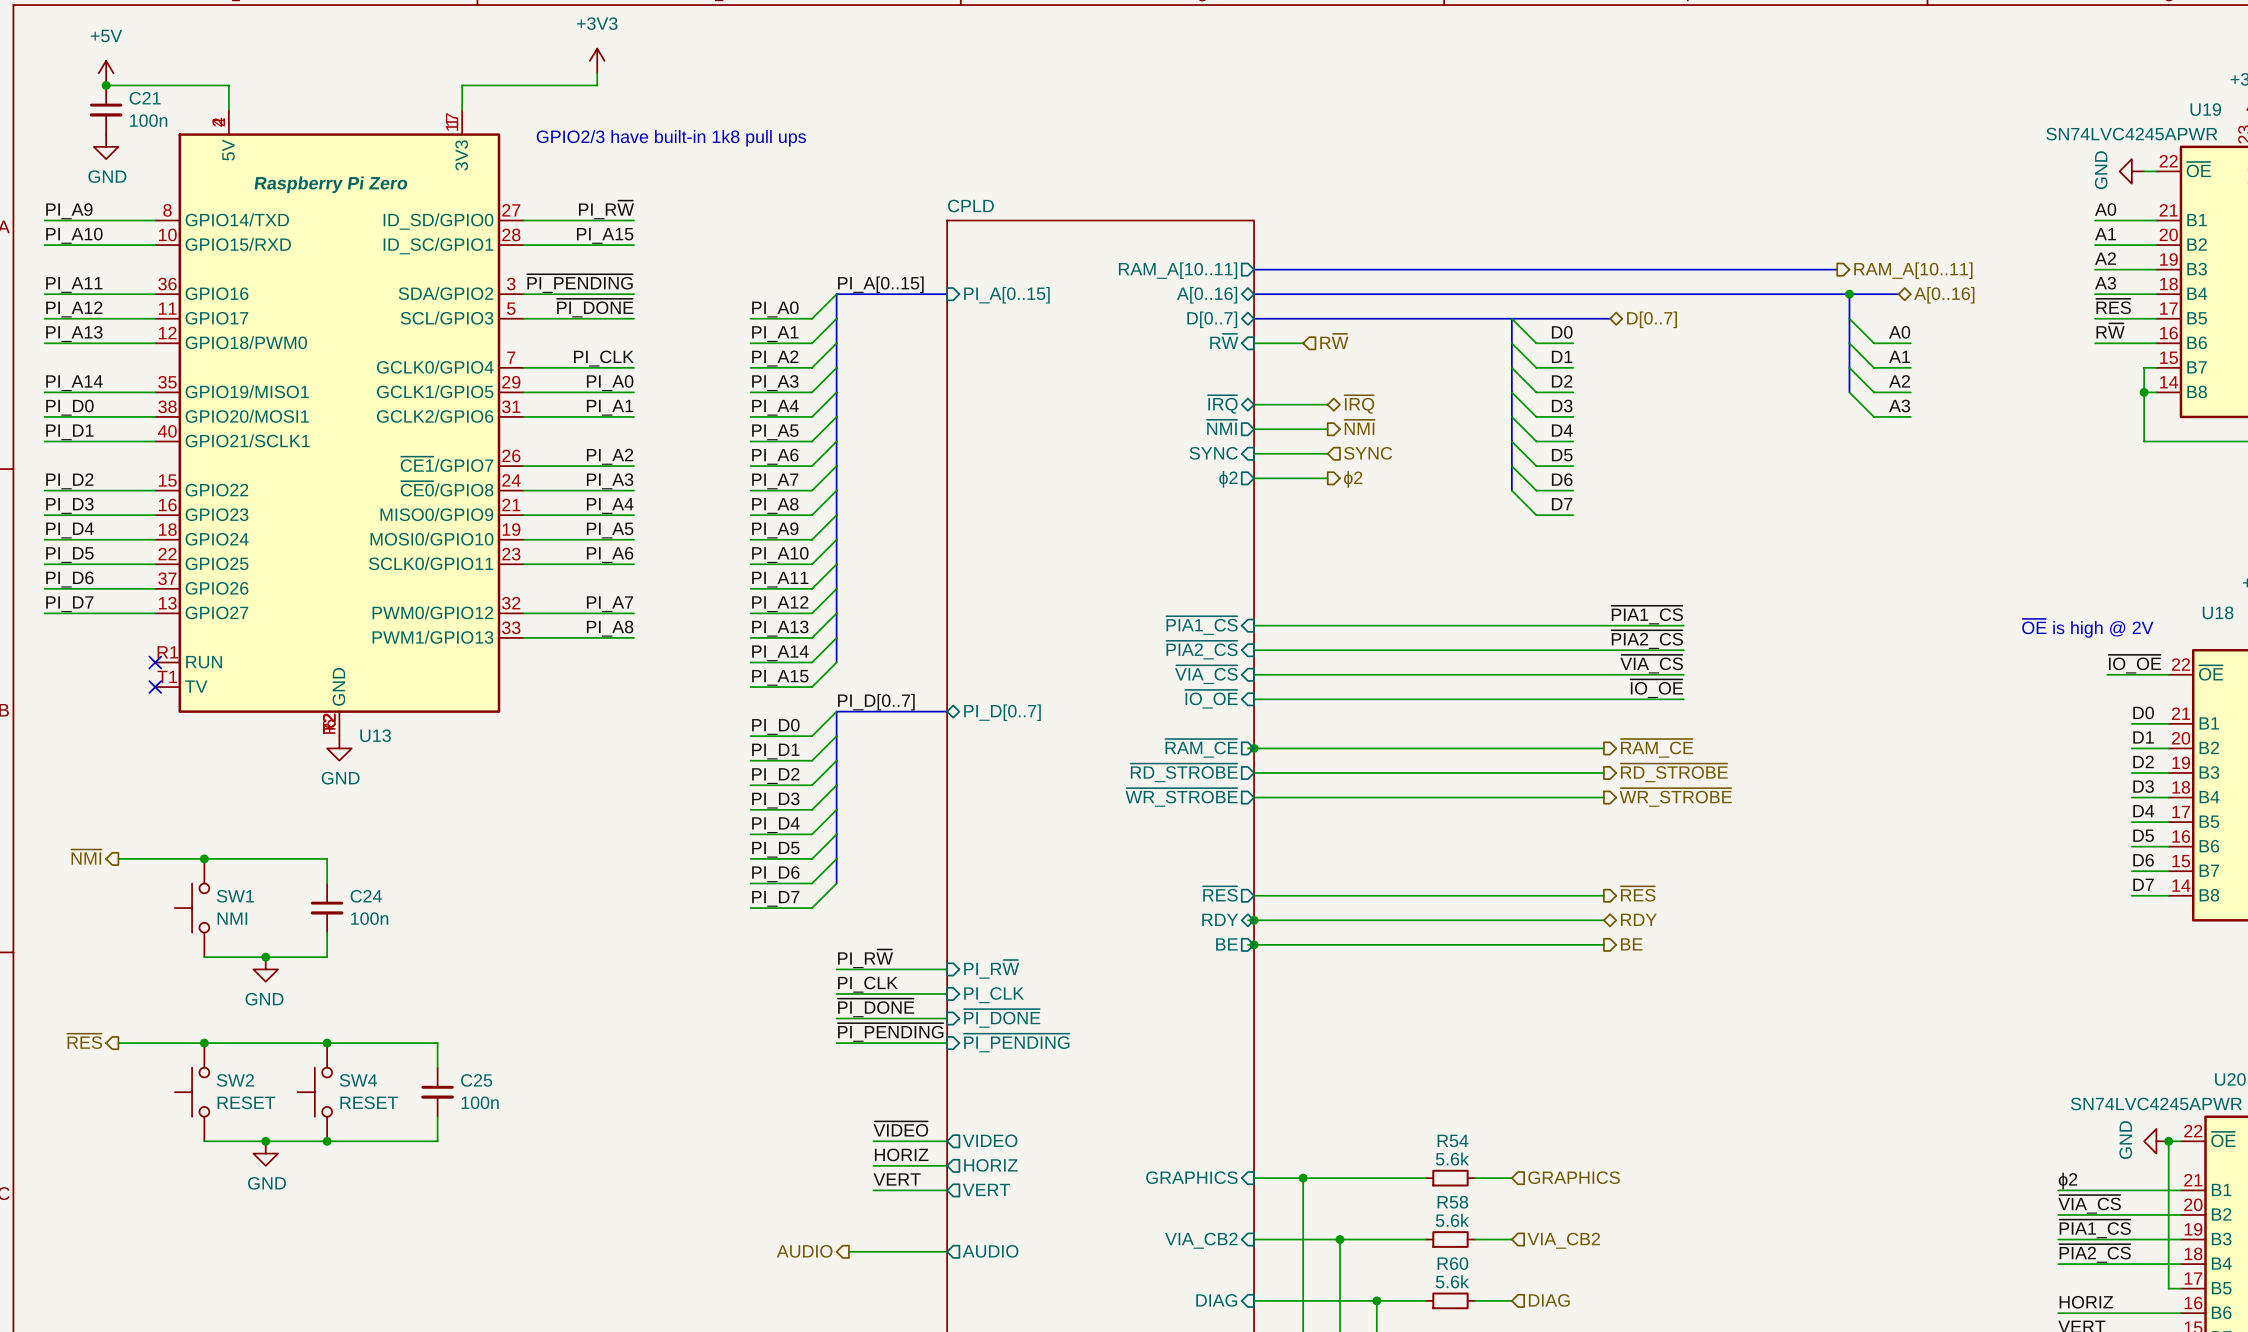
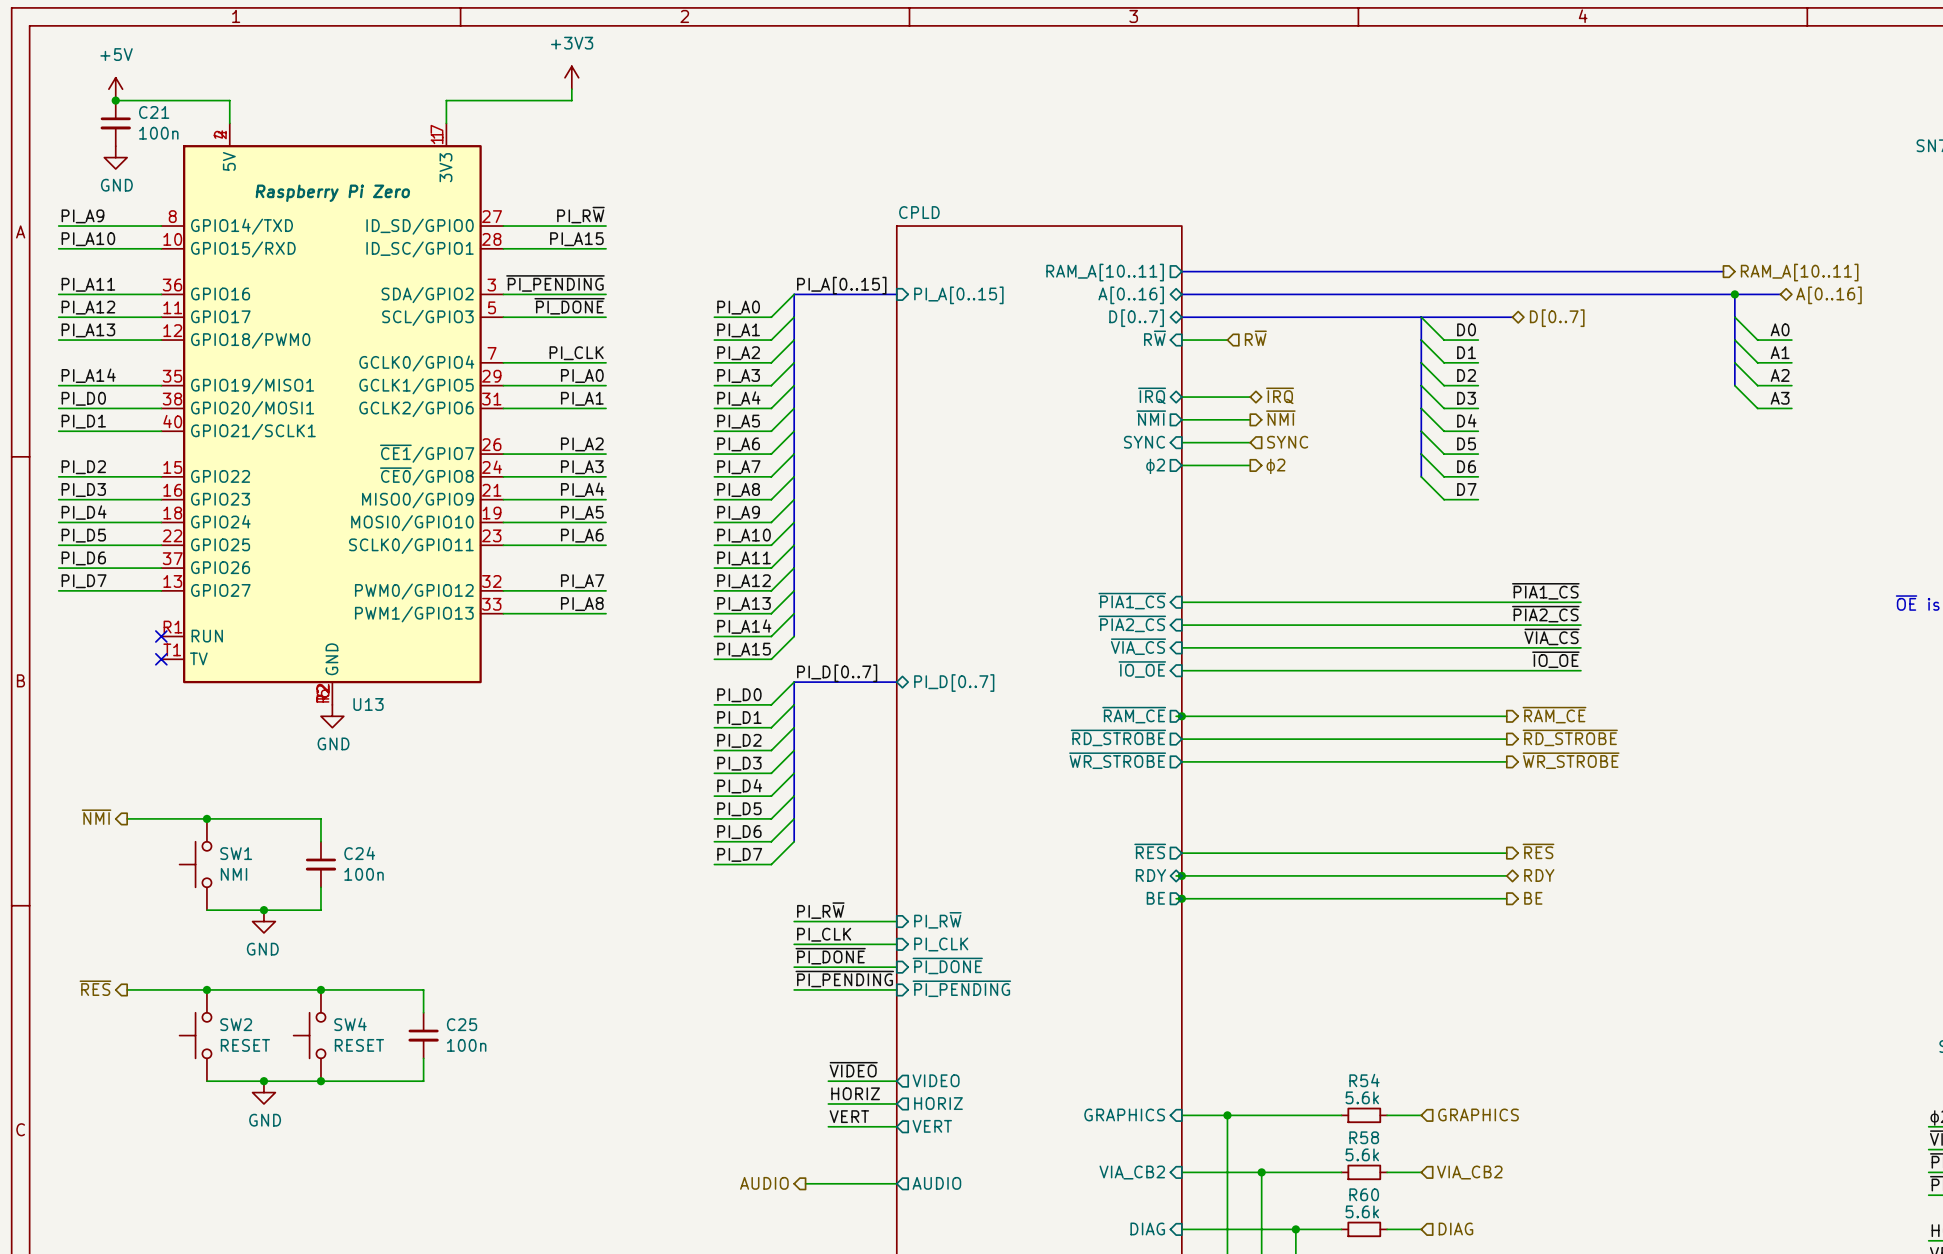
text: GPIO2/3 have built-in 1k8 pull ups (671, 138) -> none

